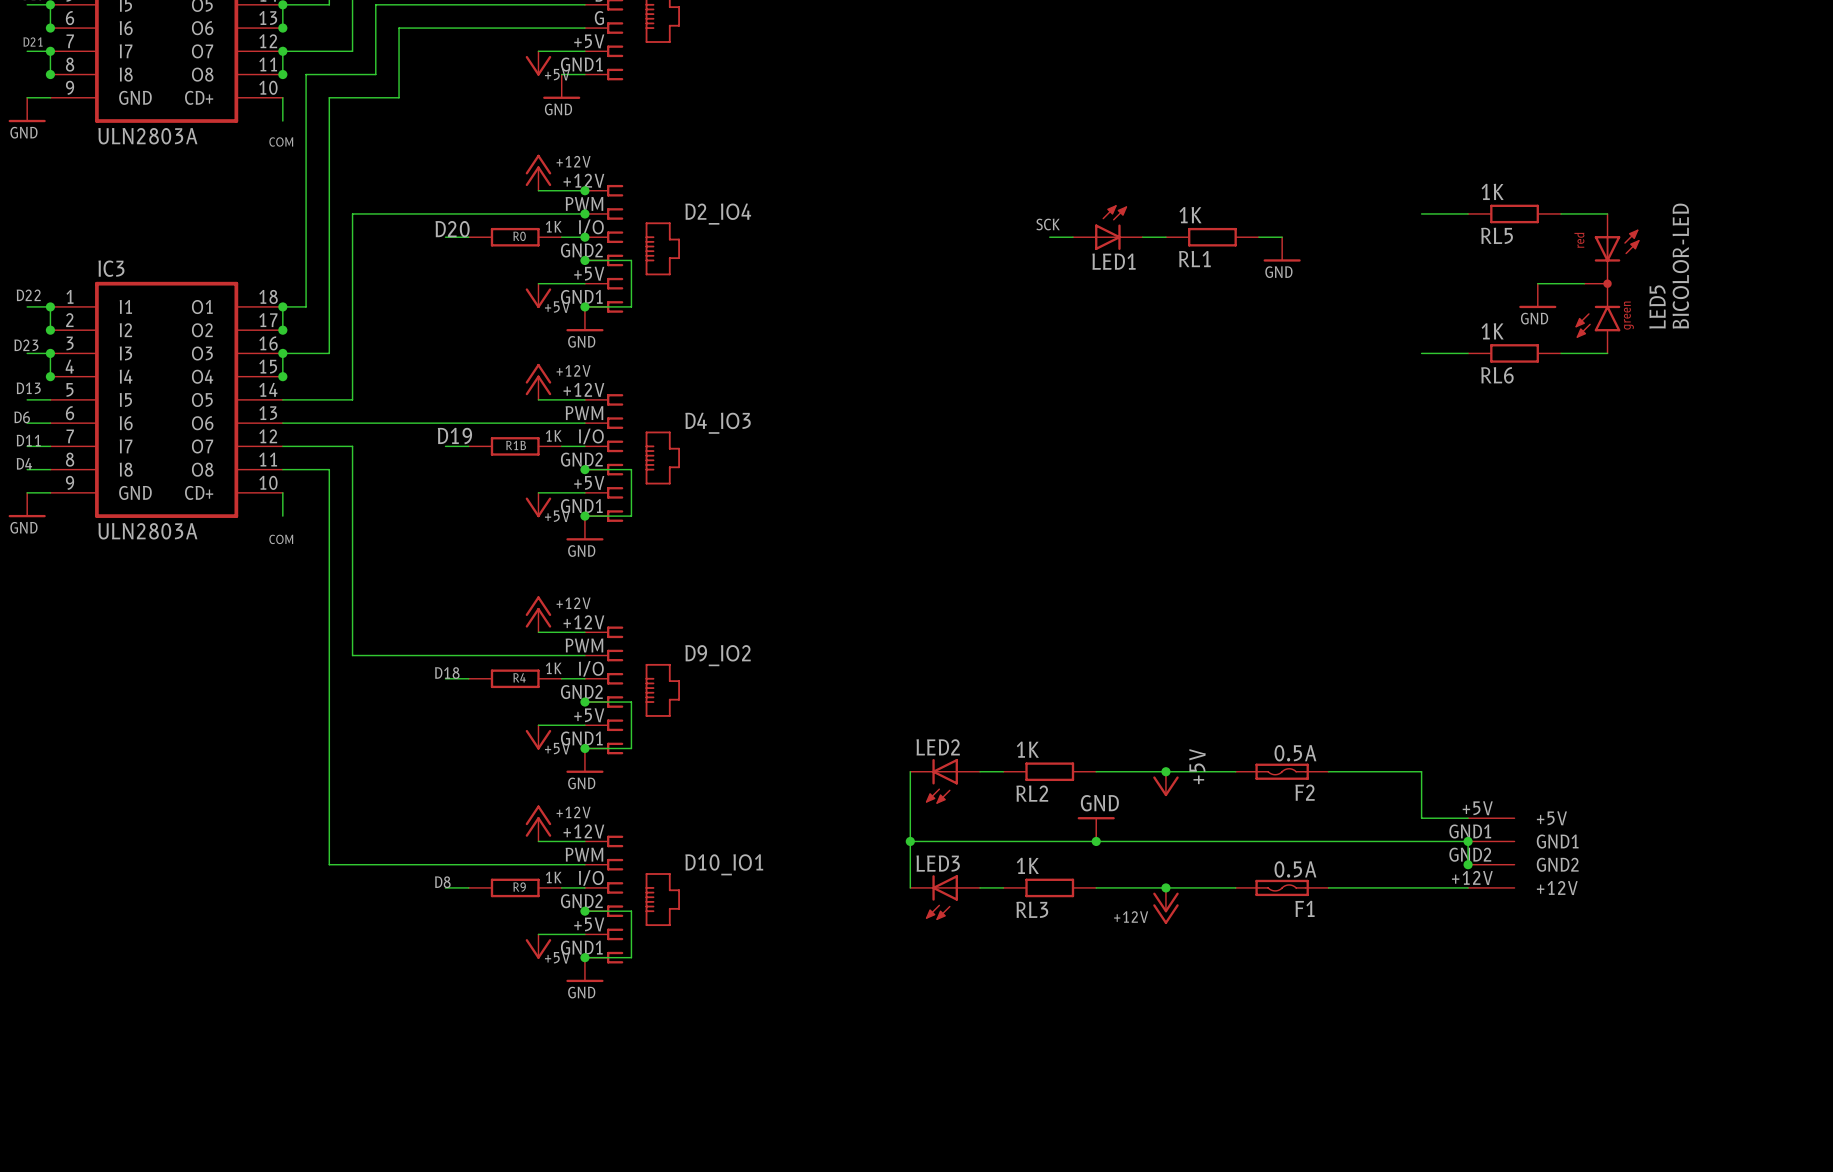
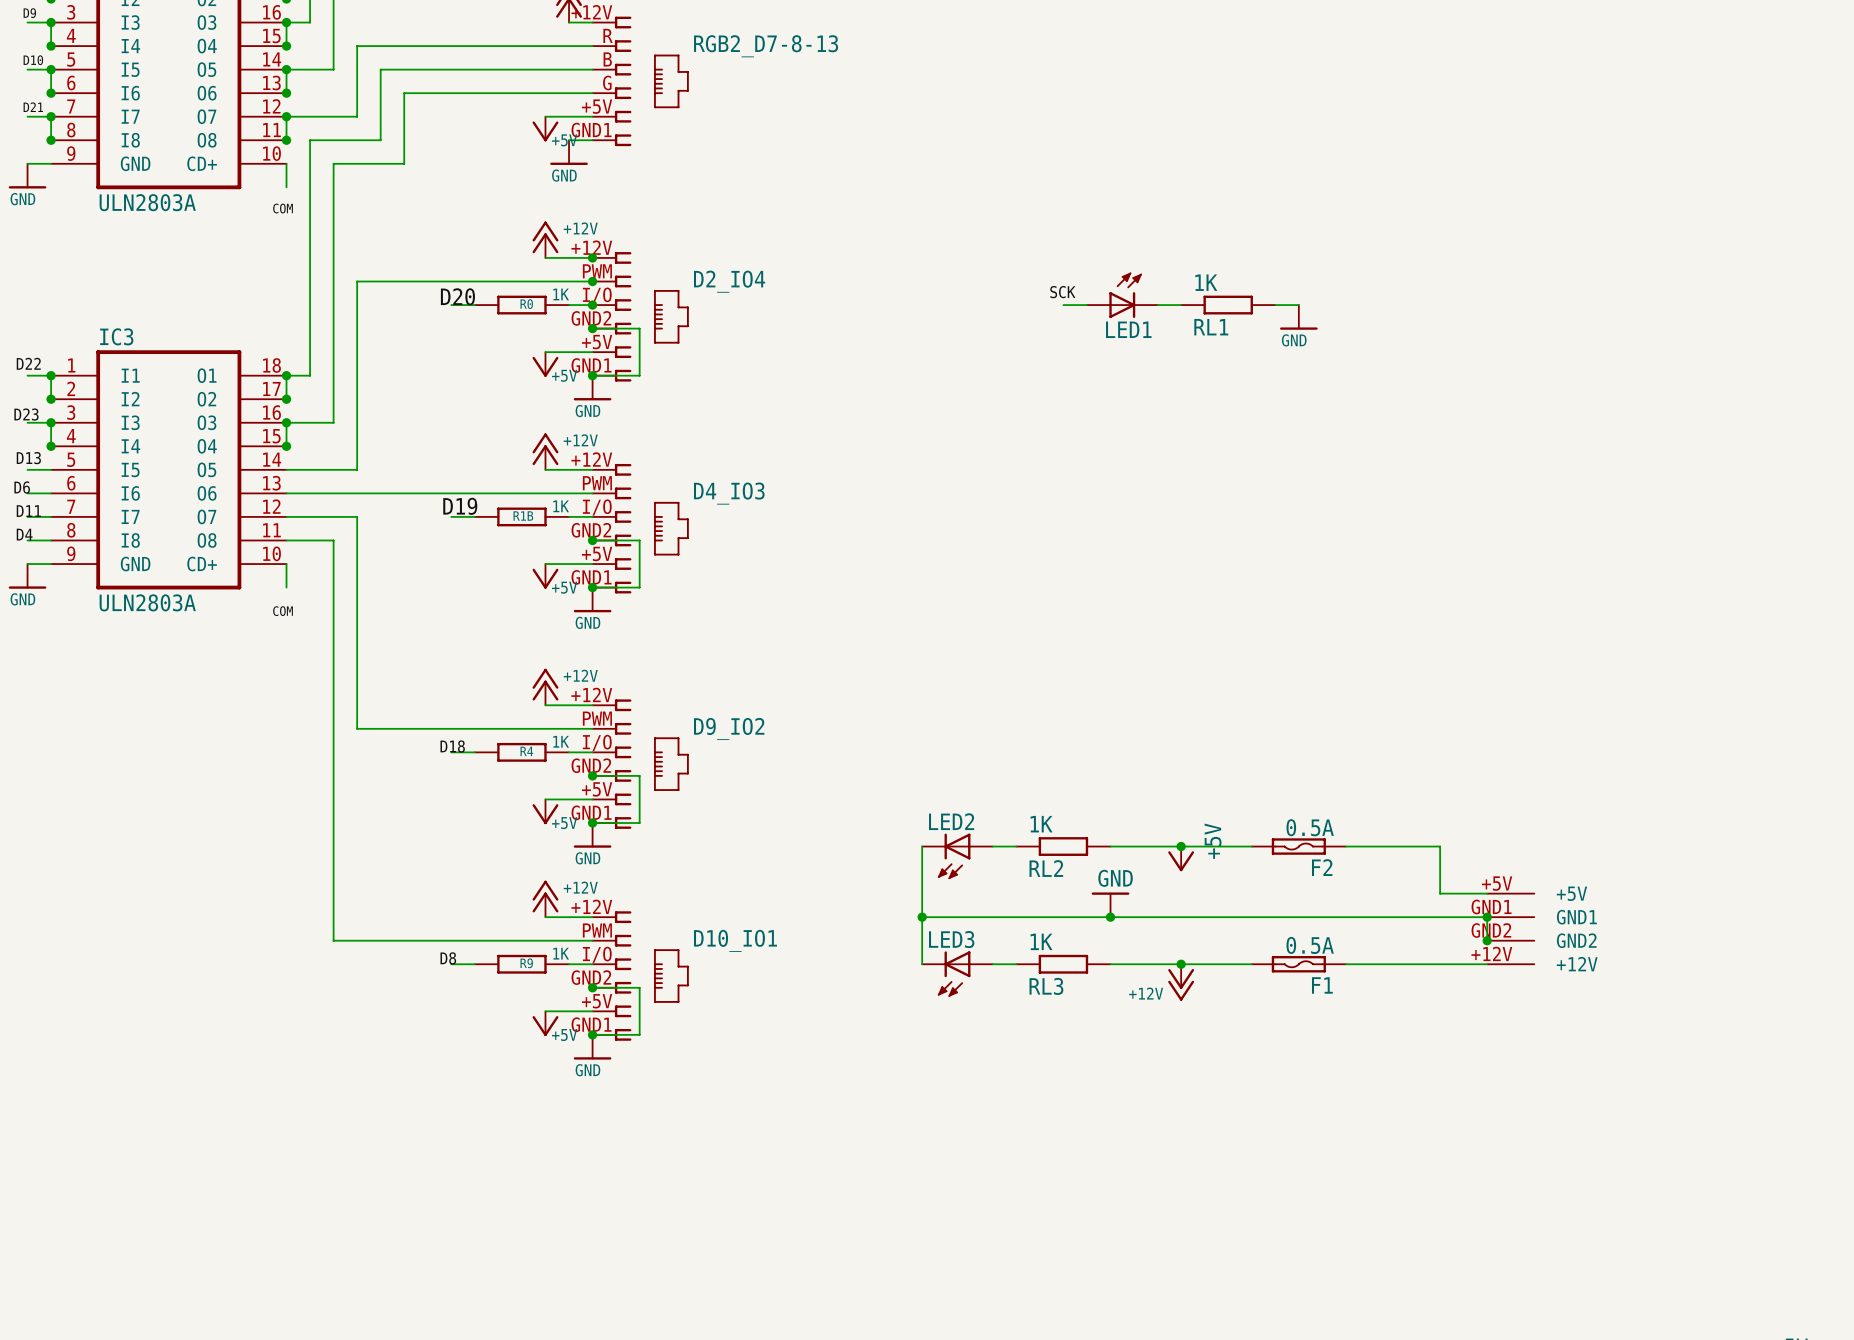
wire: (1421, 213) (1468, 213) -> none
RL5: 1K (1514, 213) -> none
wire: (1561, 213) (1607, 213) -> none
wire: (1537, 283) (1584, 283) -> none
LED5: BICOLOR-LED (1607, 283) -> none
power symbol: GND (1537, 295) -> none
wire: (1421, 353) (1468, 353) -> none
RL6: 1K (1514, 353) -> none
wire: (1561, 353) (1607, 353) -> none

